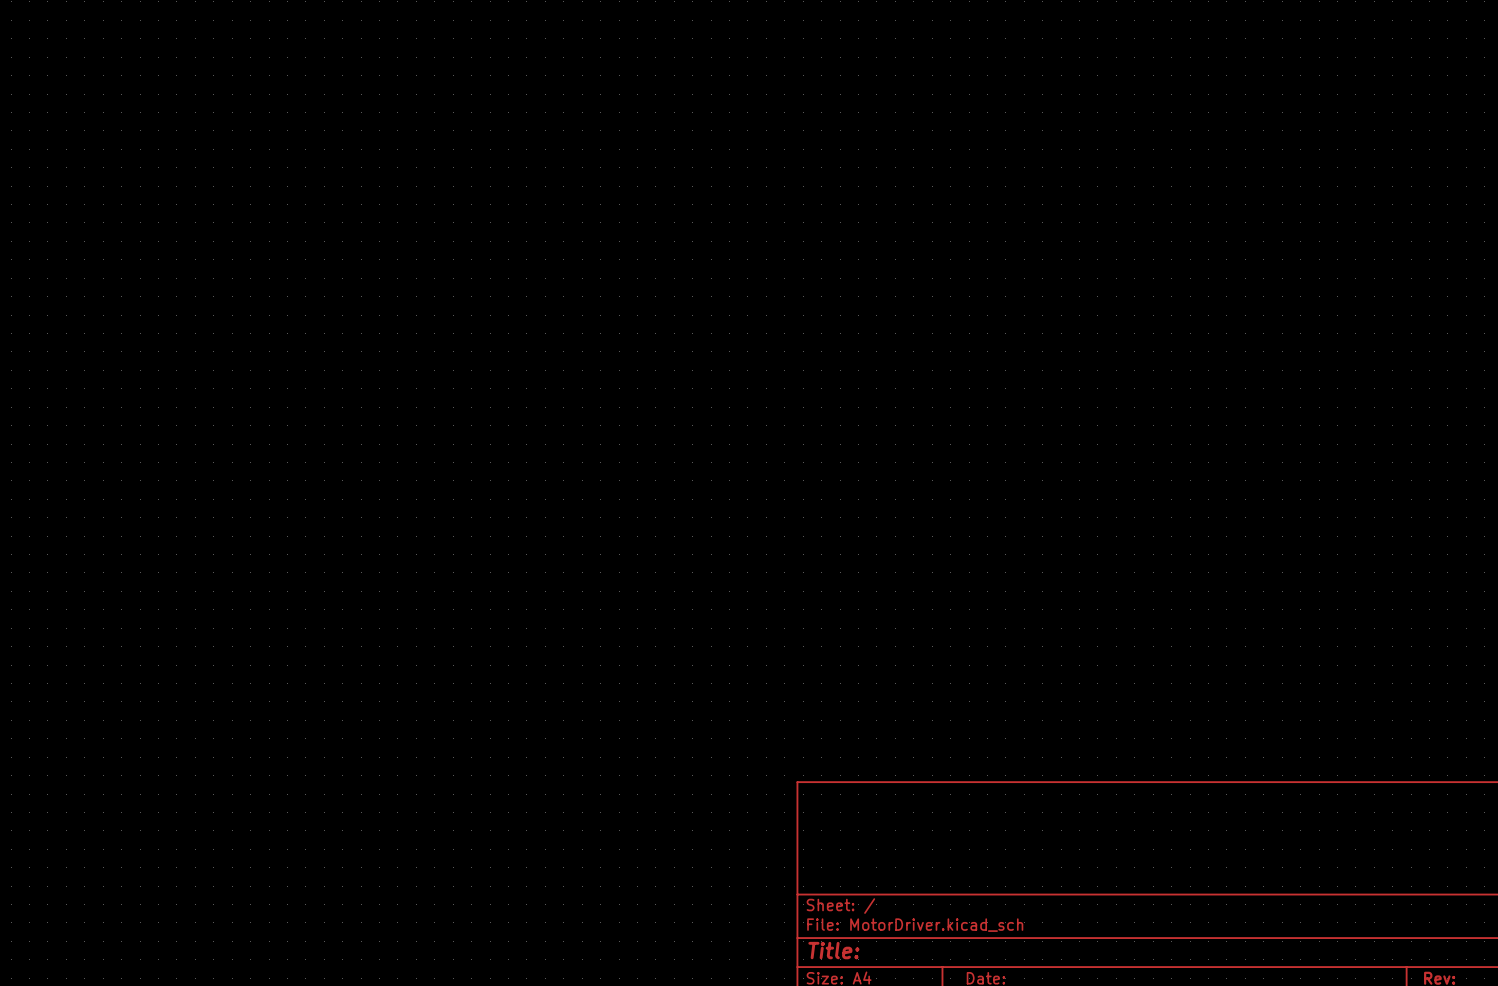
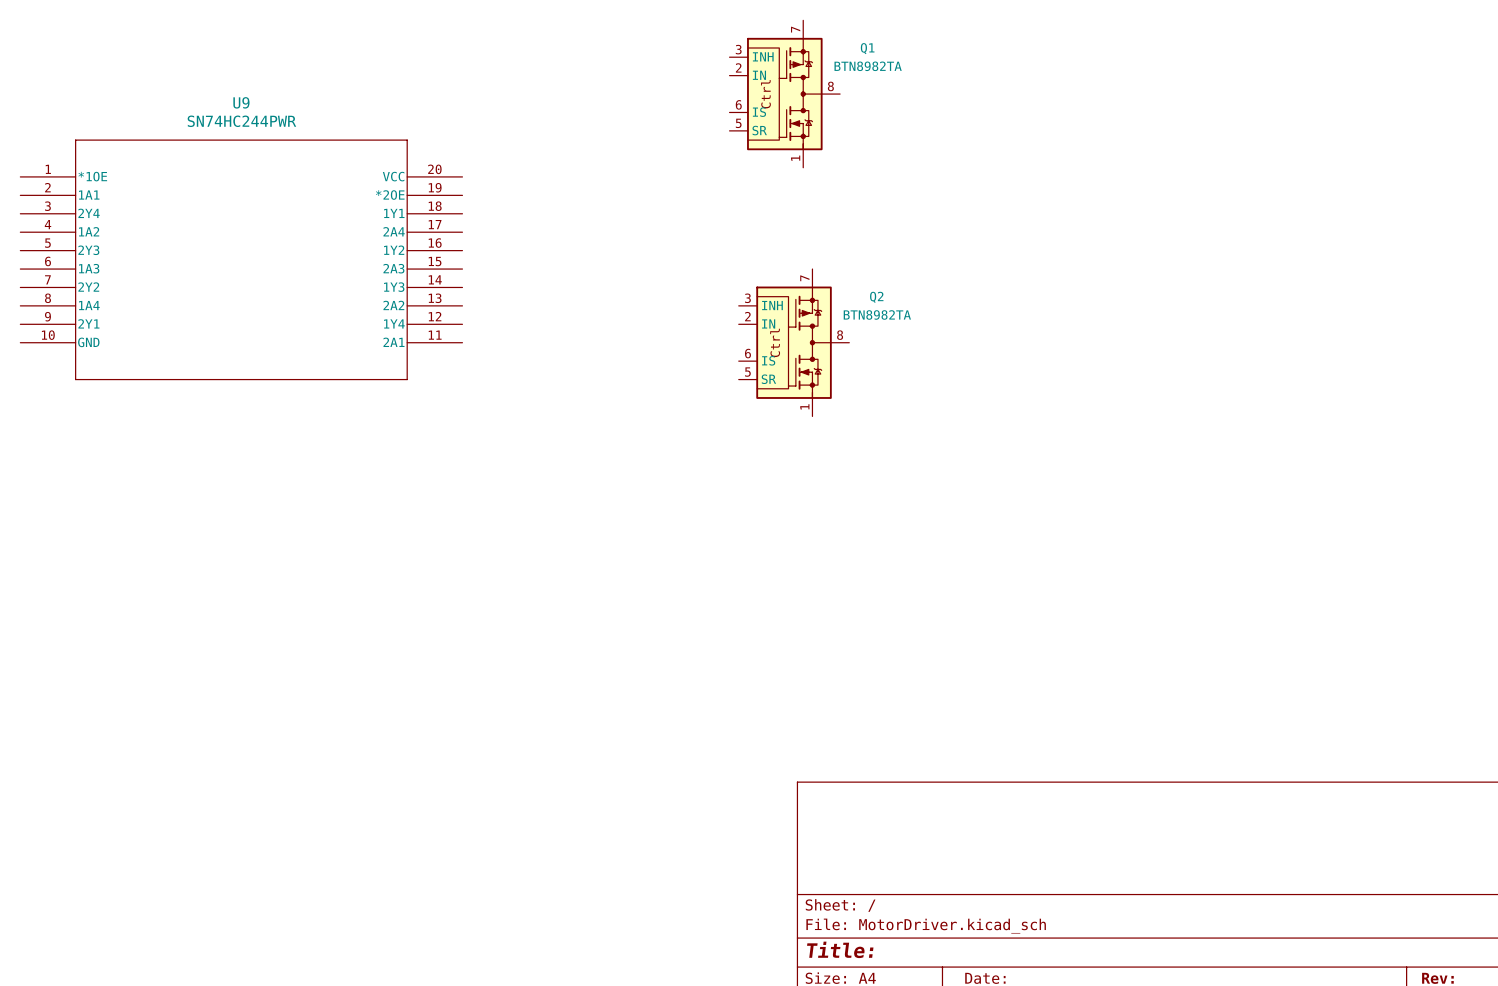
Q1: none -> BTN8982TA (784, 94)
U9: none -> SN74HC244PWR (241, 259)
Q2: none -> BTN8982TA (794, 342)

